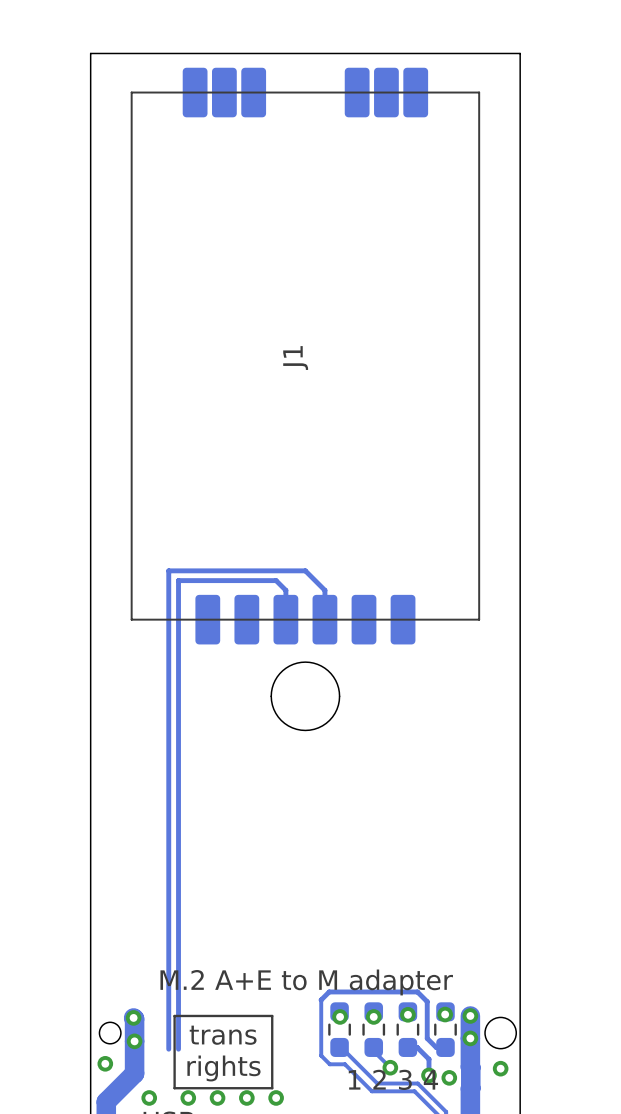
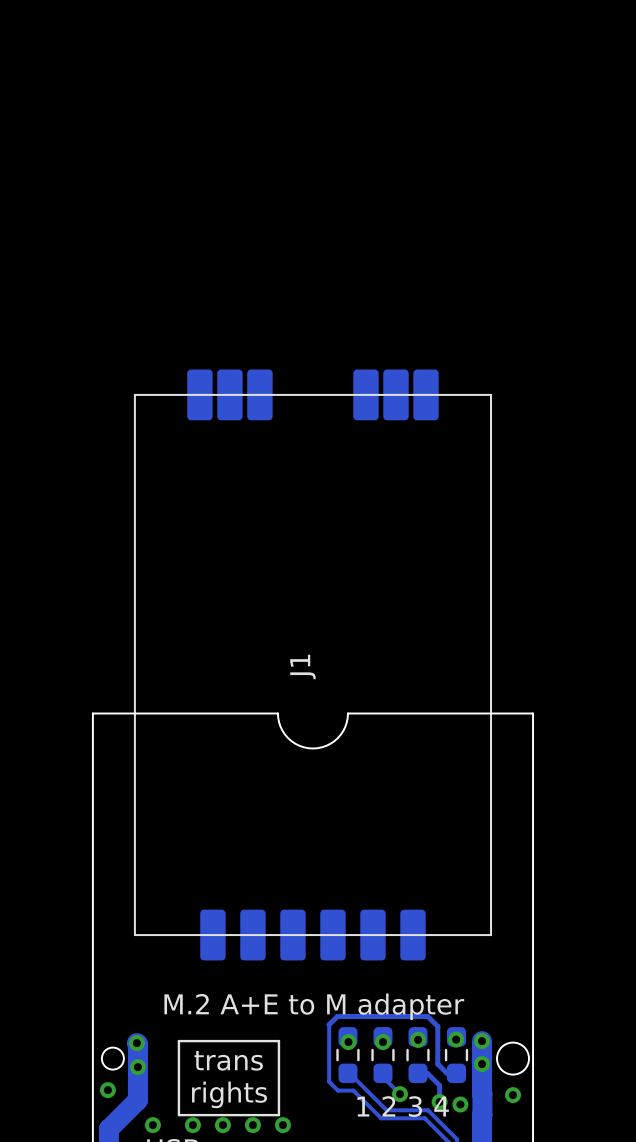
J1 position: (305, 356) -> (312, 664)
track: (285, 619) (285, 590) (276, 580) (178, 580) (178, 1049) -> none
track: (324, 619) (324, 590) (305, 570) (168, 570) (168, 1049) -> none
board edge: (339, 696) (335, 680) (328, 670) (317, 664) (305, 662) (293, 664) (282, 670) (275, 680) (271, 696) -> (92, 713) (277, 713)
board edge: (520, 696) (520, 53) (90, 53) (90, 696) -> (533, 713) (347, 713)

